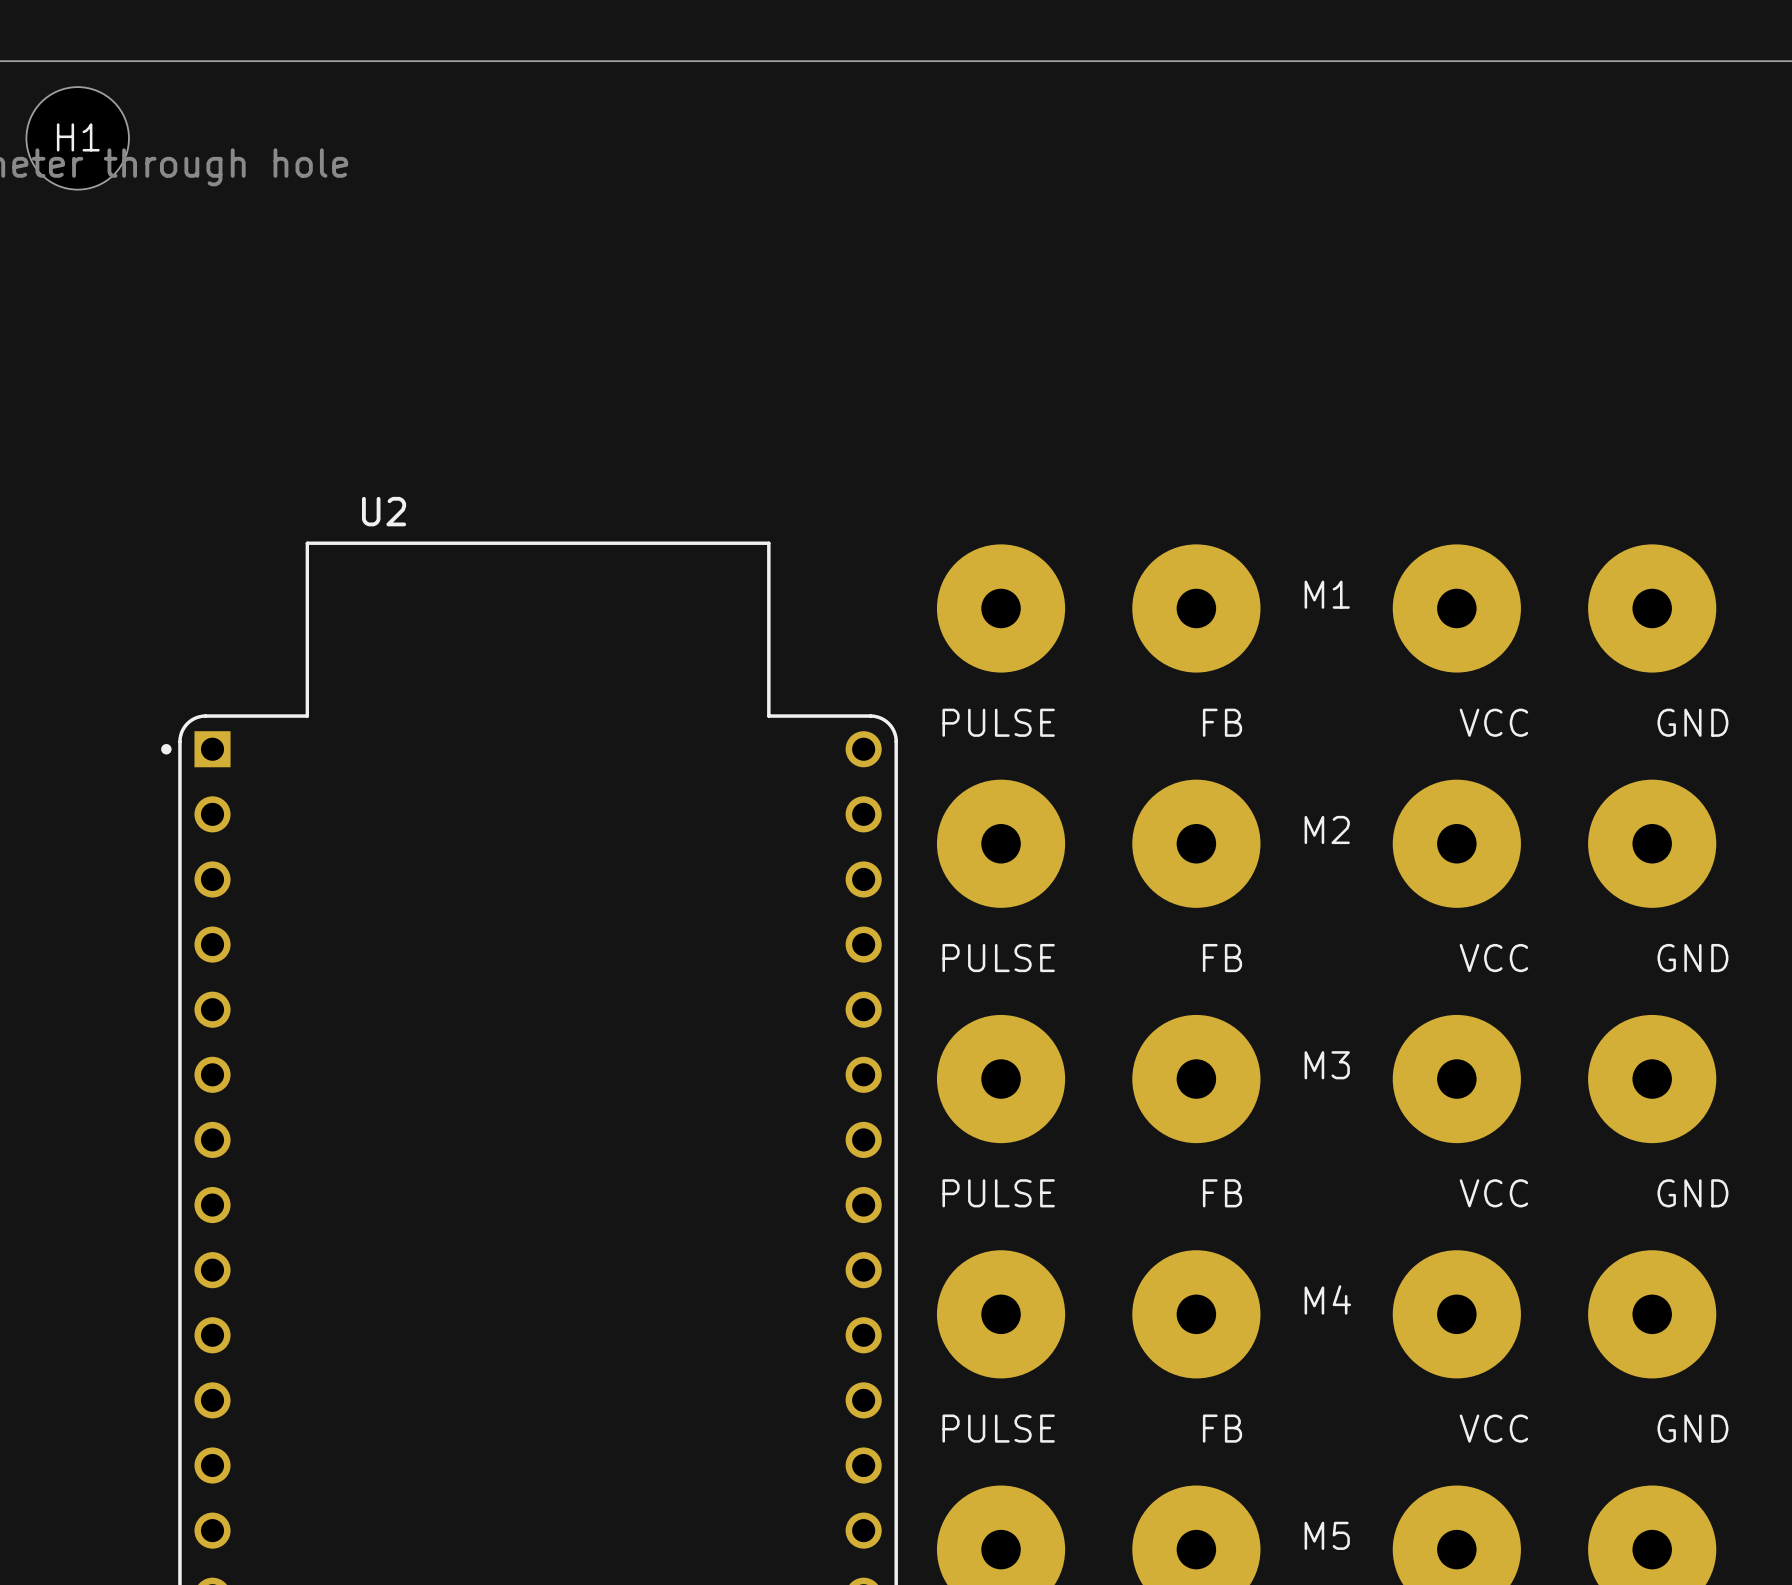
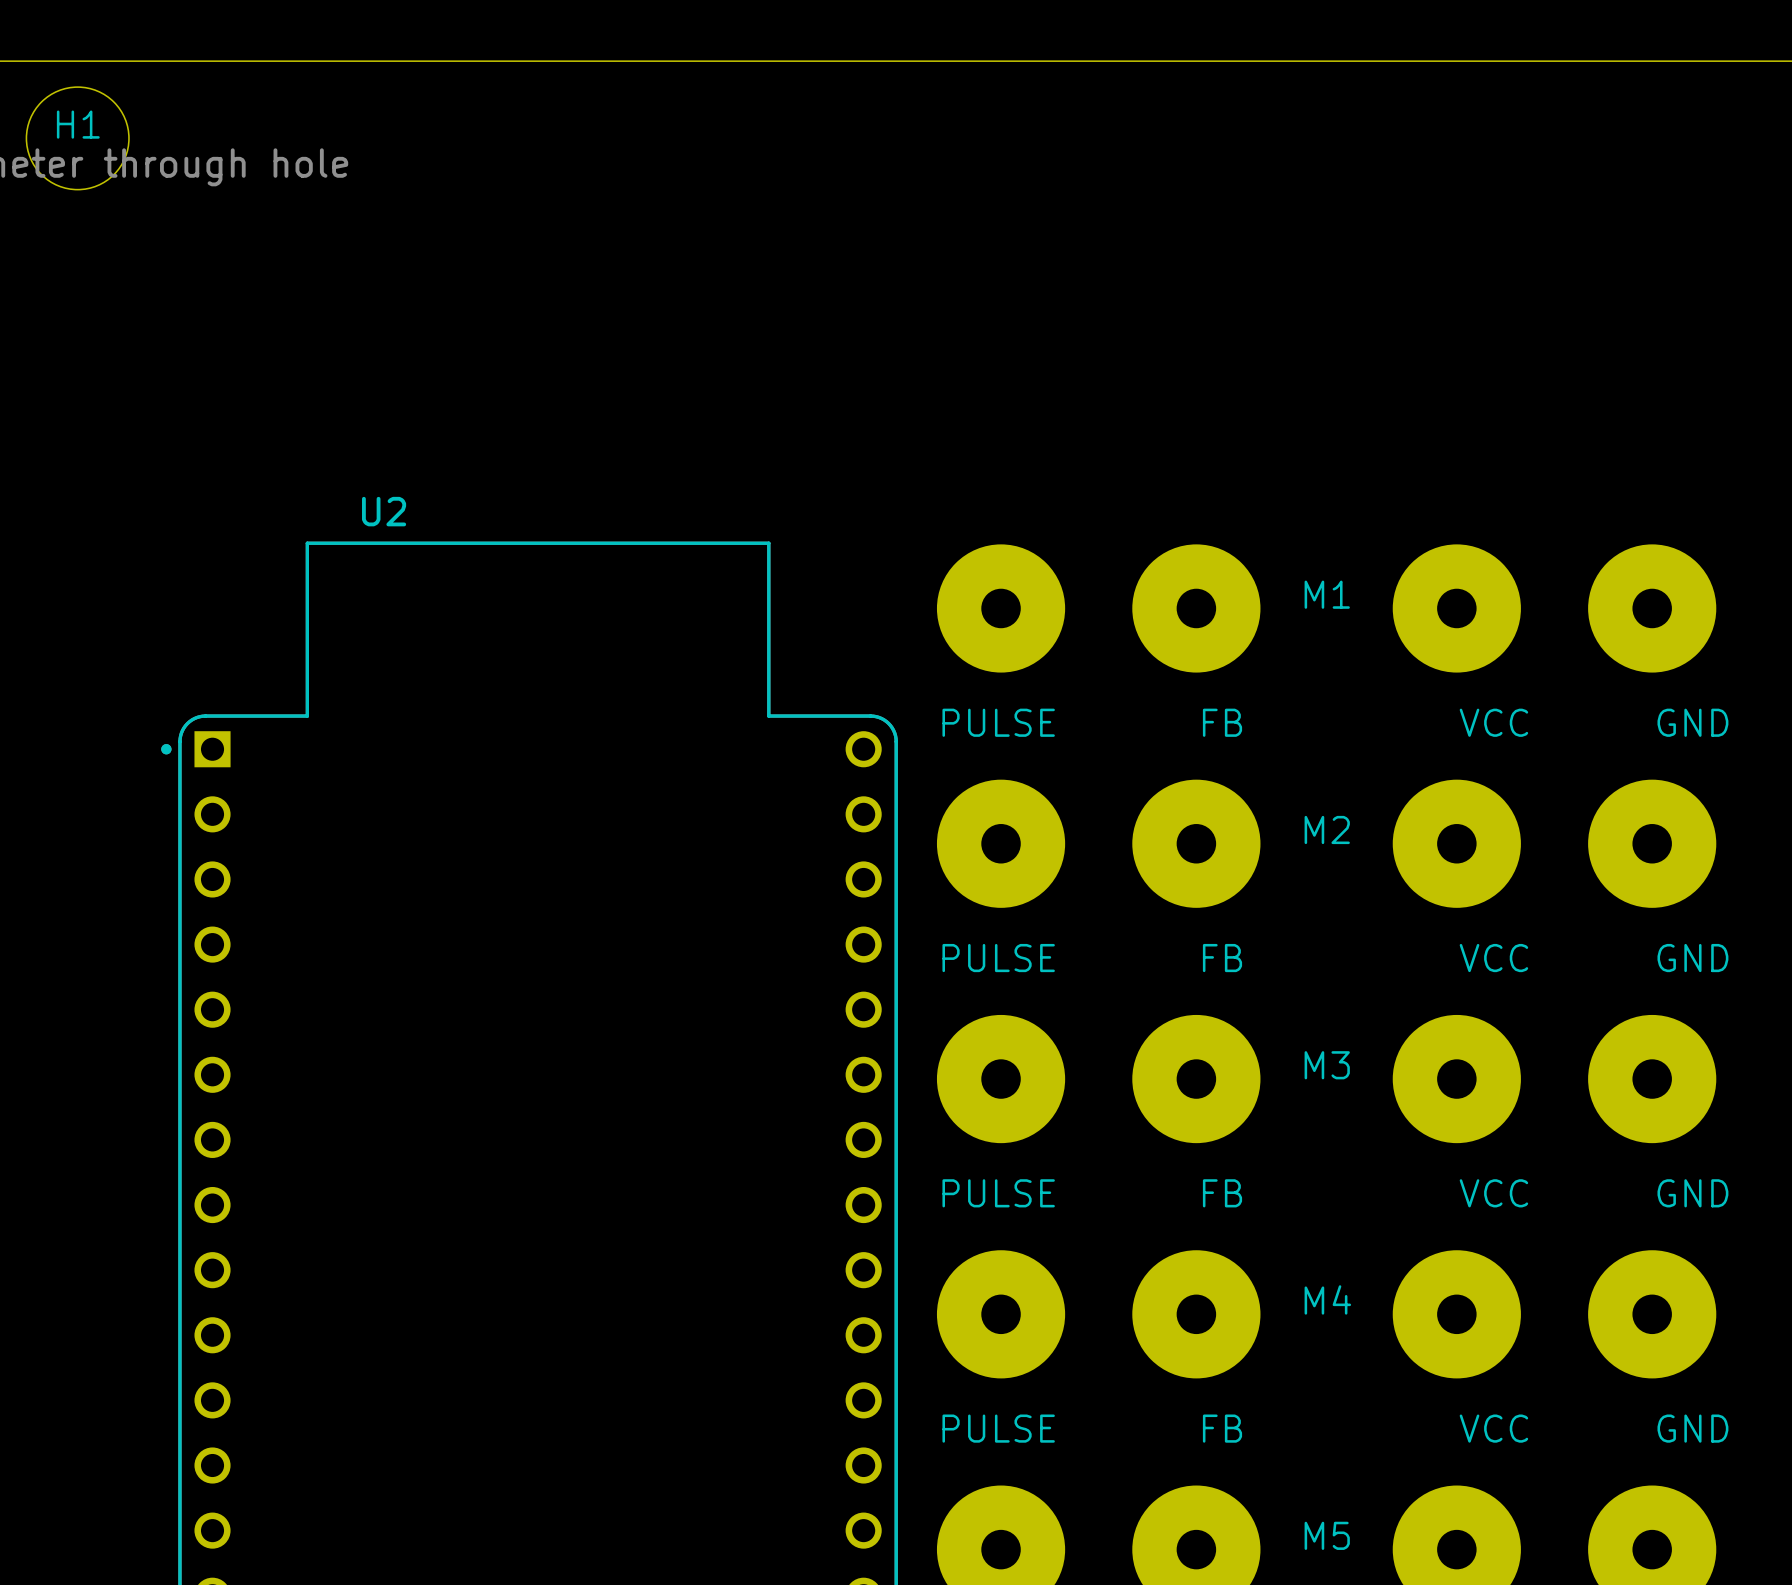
H1 name position: H1 (78, 137) -> H1 (78, 124)

